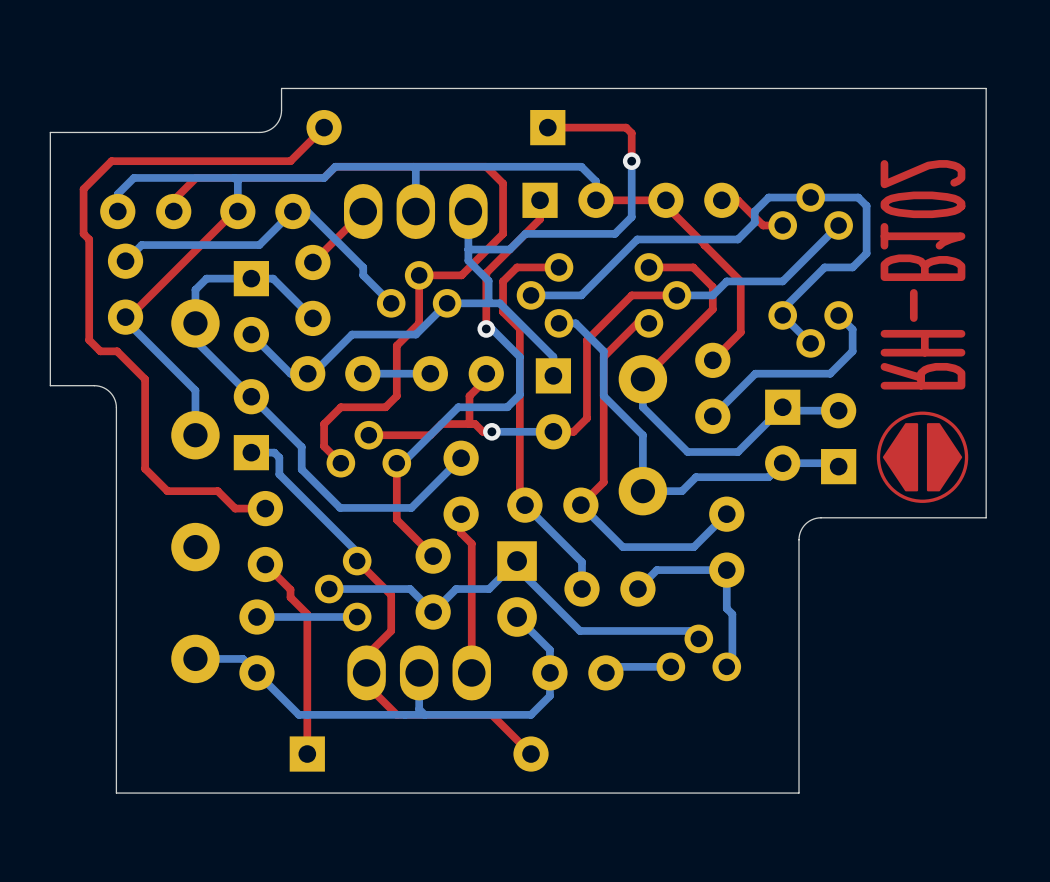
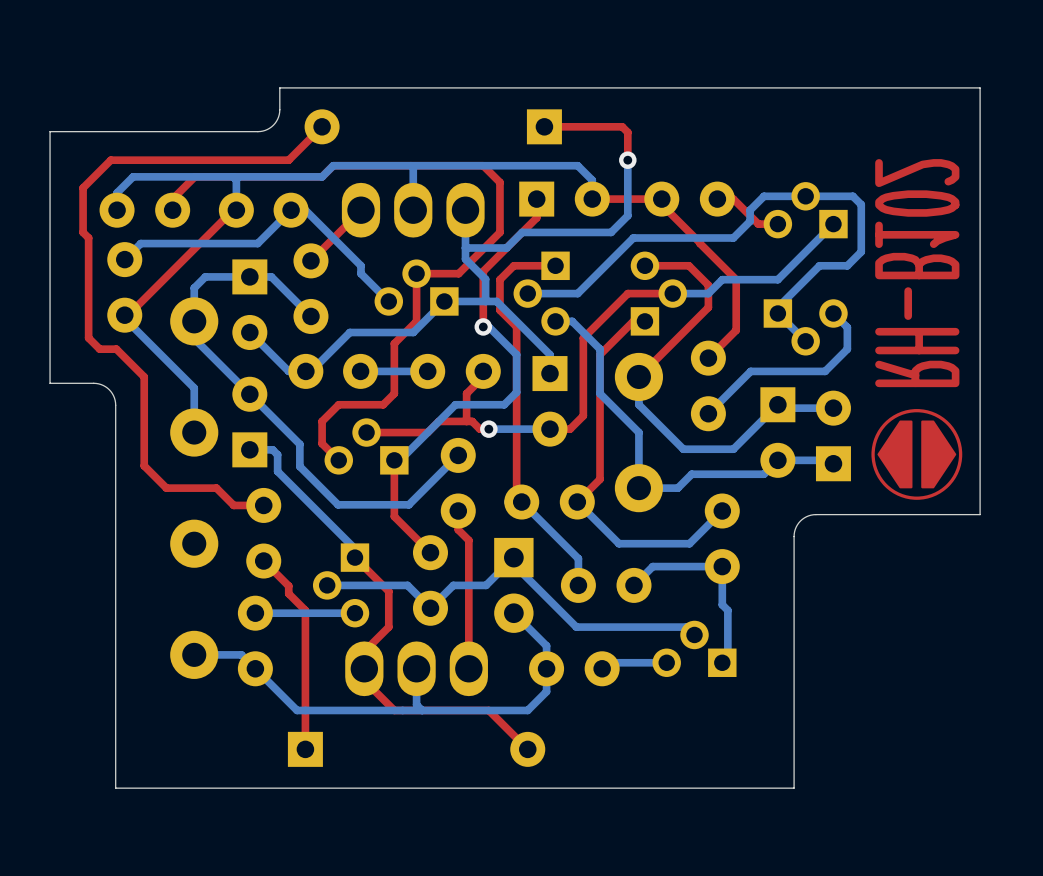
part footprint: [768, 183, 853, 240] -> [763, 182, 848, 239]
part footprint: [516, 253, 574, 338] -> [513, 251, 570, 336]
part footprint: [634, 253, 692, 338] -> [630, 251, 687, 336]
part footprint: [376, 261, 462, 318] -> [374, 259, 459, 316]
part footprint: [768, 301, 853, 358] -> [763, 299, 848, 356]
part footprint: [326, 420, 412, 478] -> [324, 418, 409, 475]
part footprint: [314, 546, 372, 632] -> [312, 543, 370, 628]
part footprint: [656, 624, 742, 682] -> [652, 620, 737, 677]

